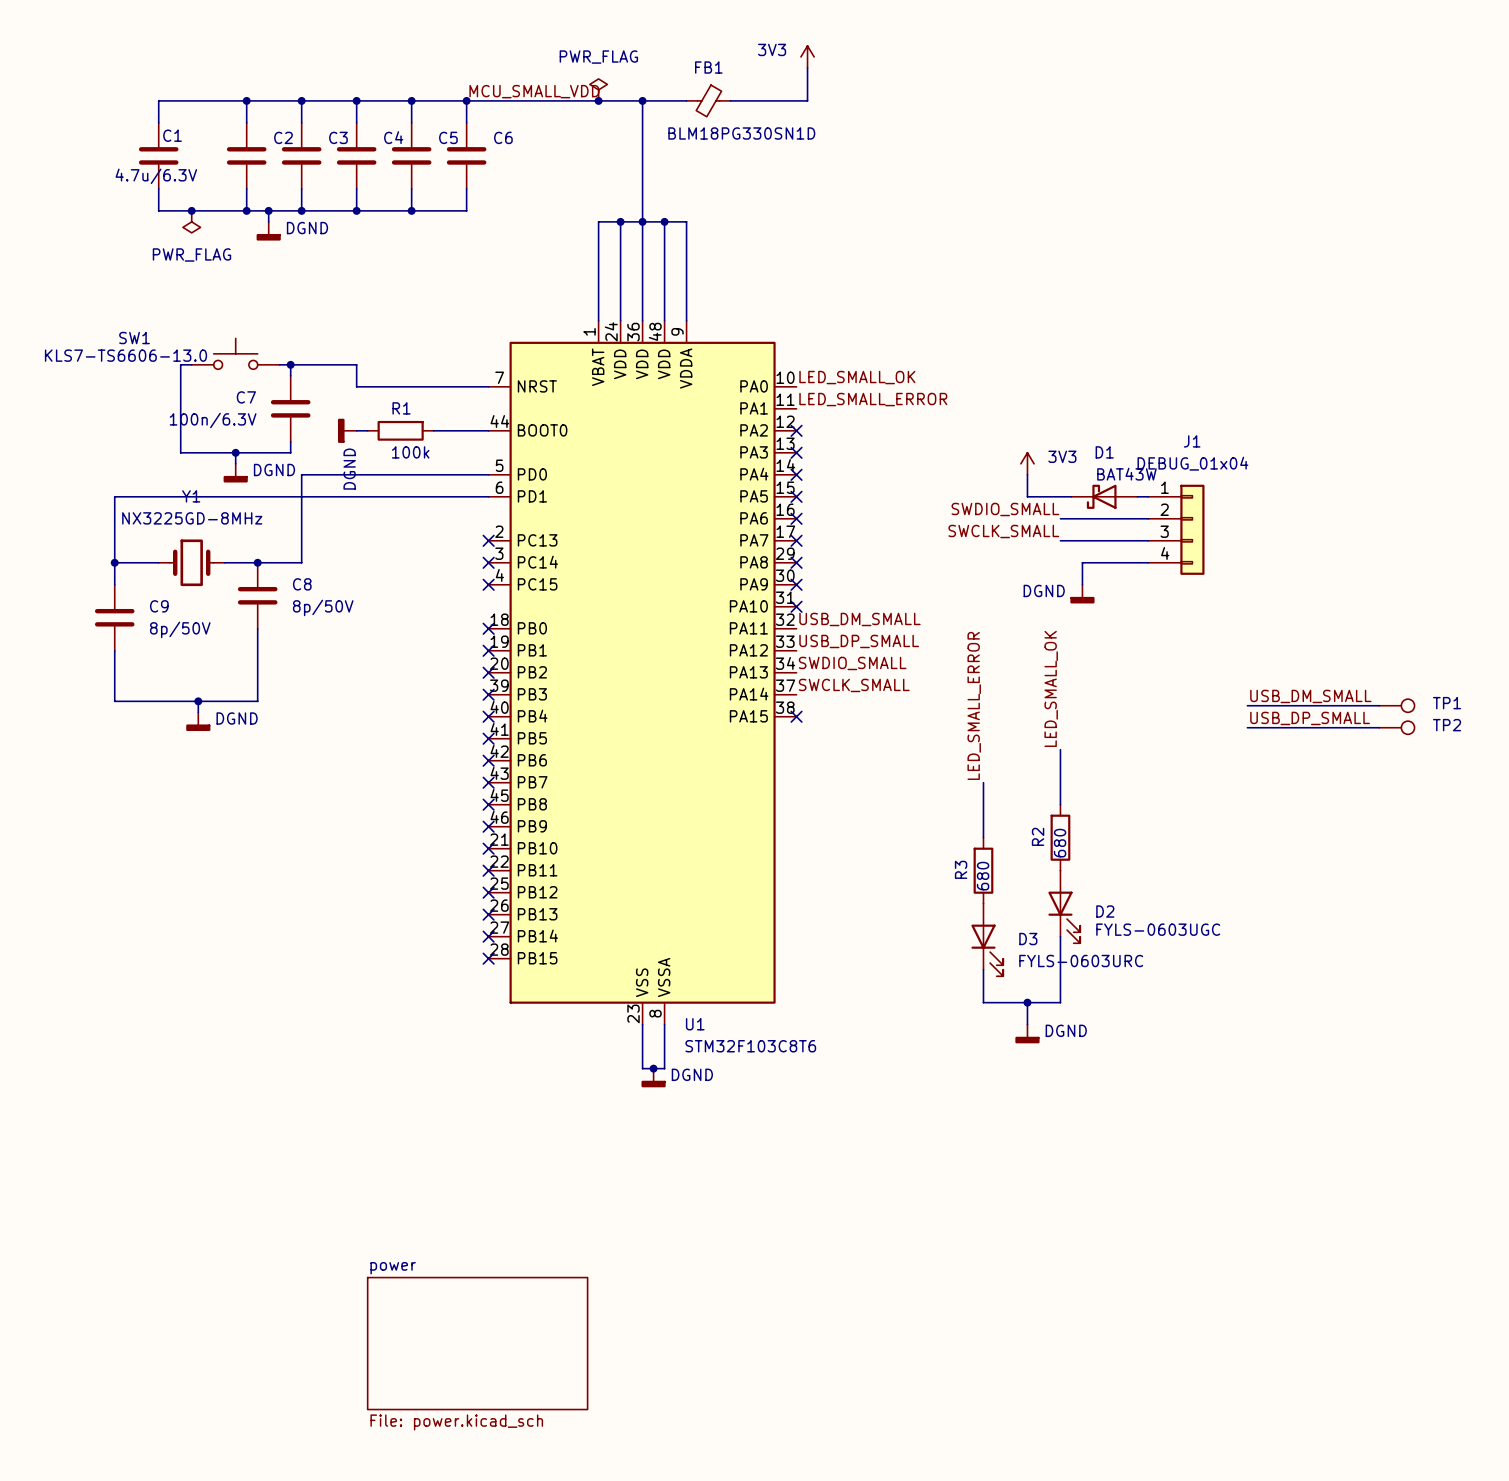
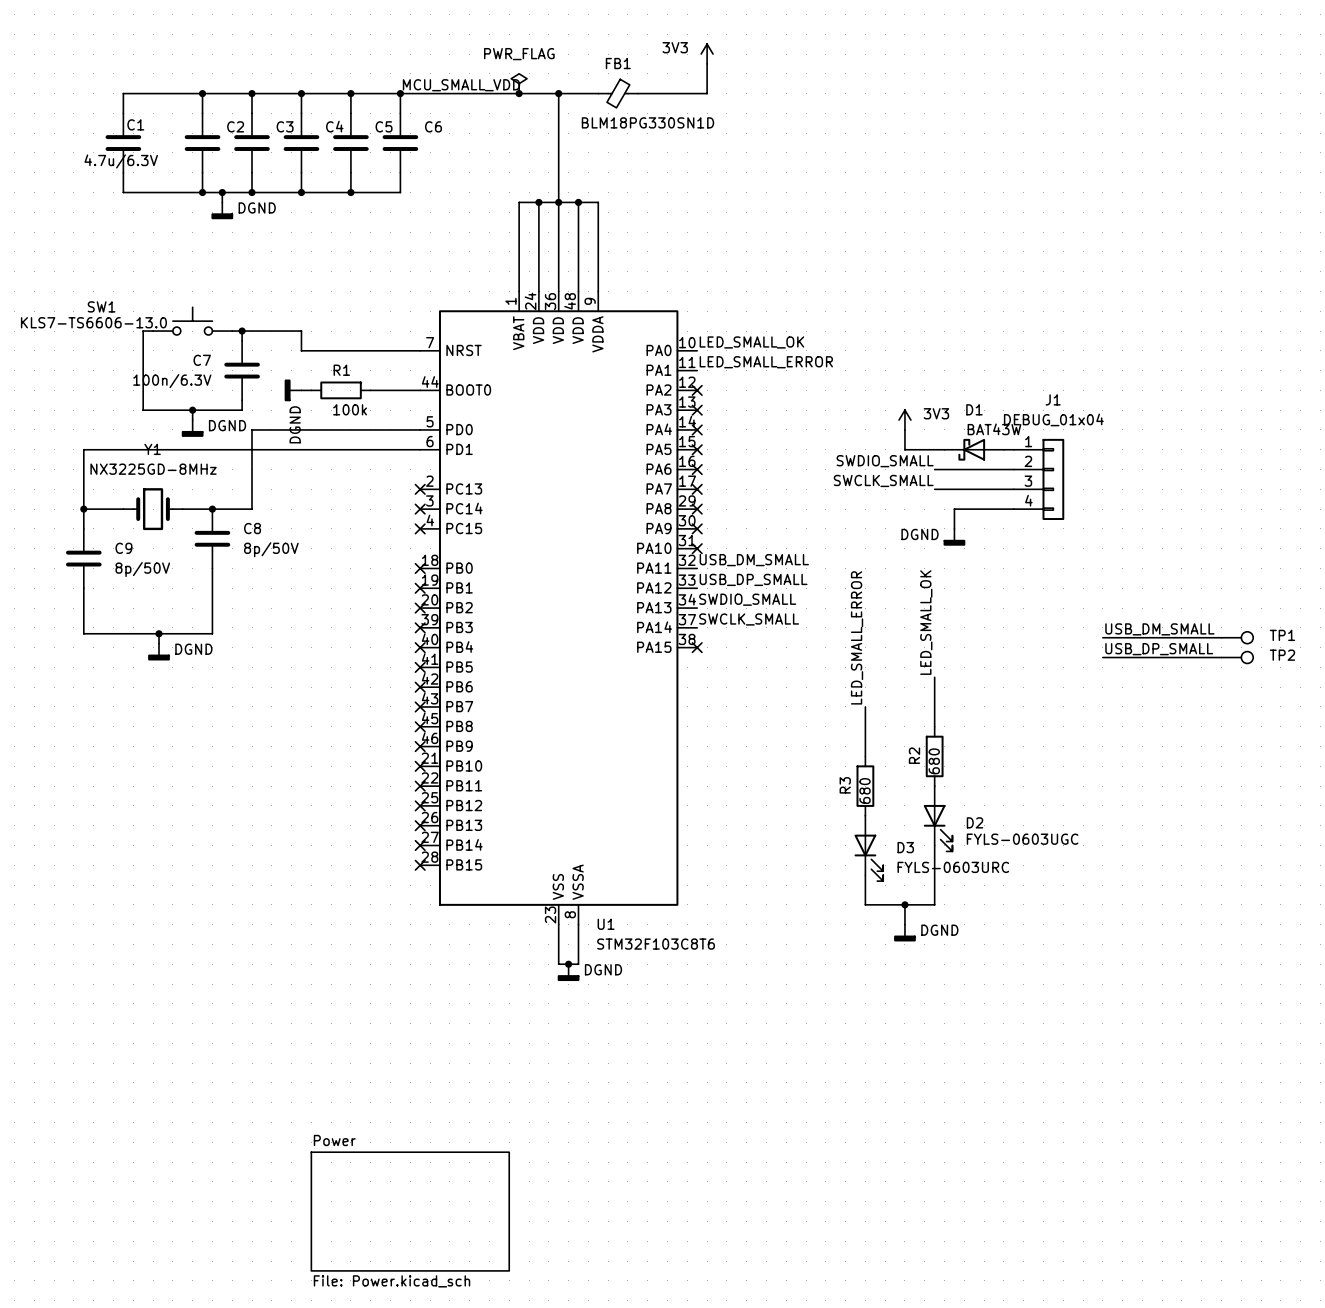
junction: (191, 210) -> none
power symbol: PWR_FLAG (191, 221) -> none
sheet power name: power (393, 1268) -> Power (334, 1140)
sheet power value: File: power.kicad_sch (456, 1422) -> File: Power.kicad_sch (392, 1281)

